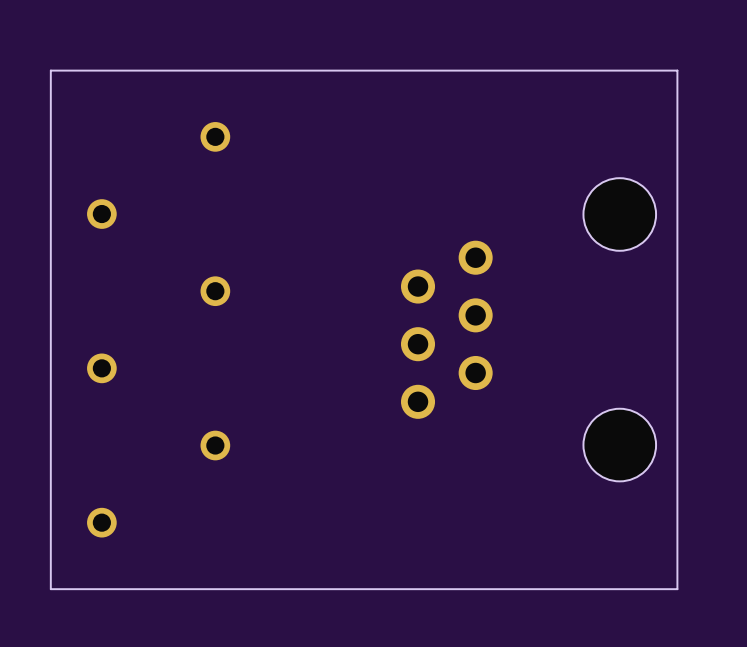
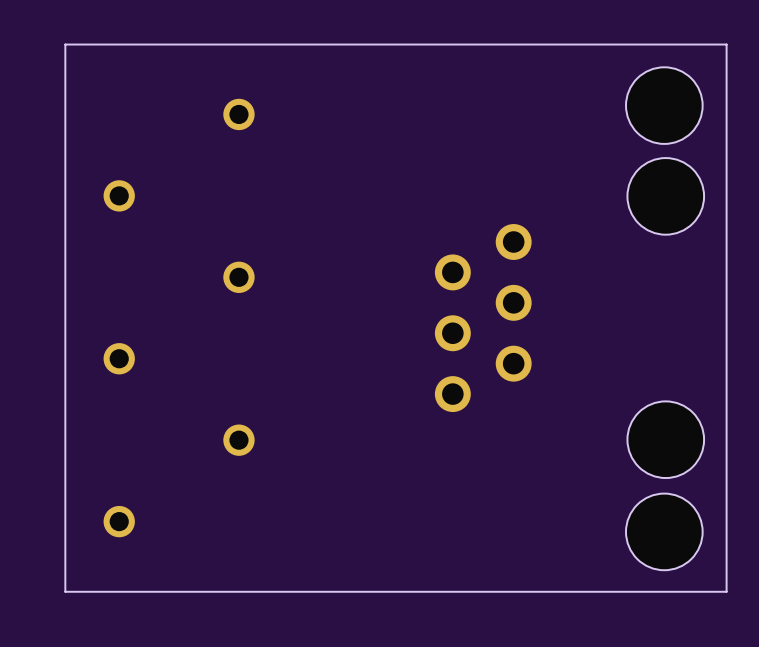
hole: none -> (664, 105)
hole: none -> (664, 531)

